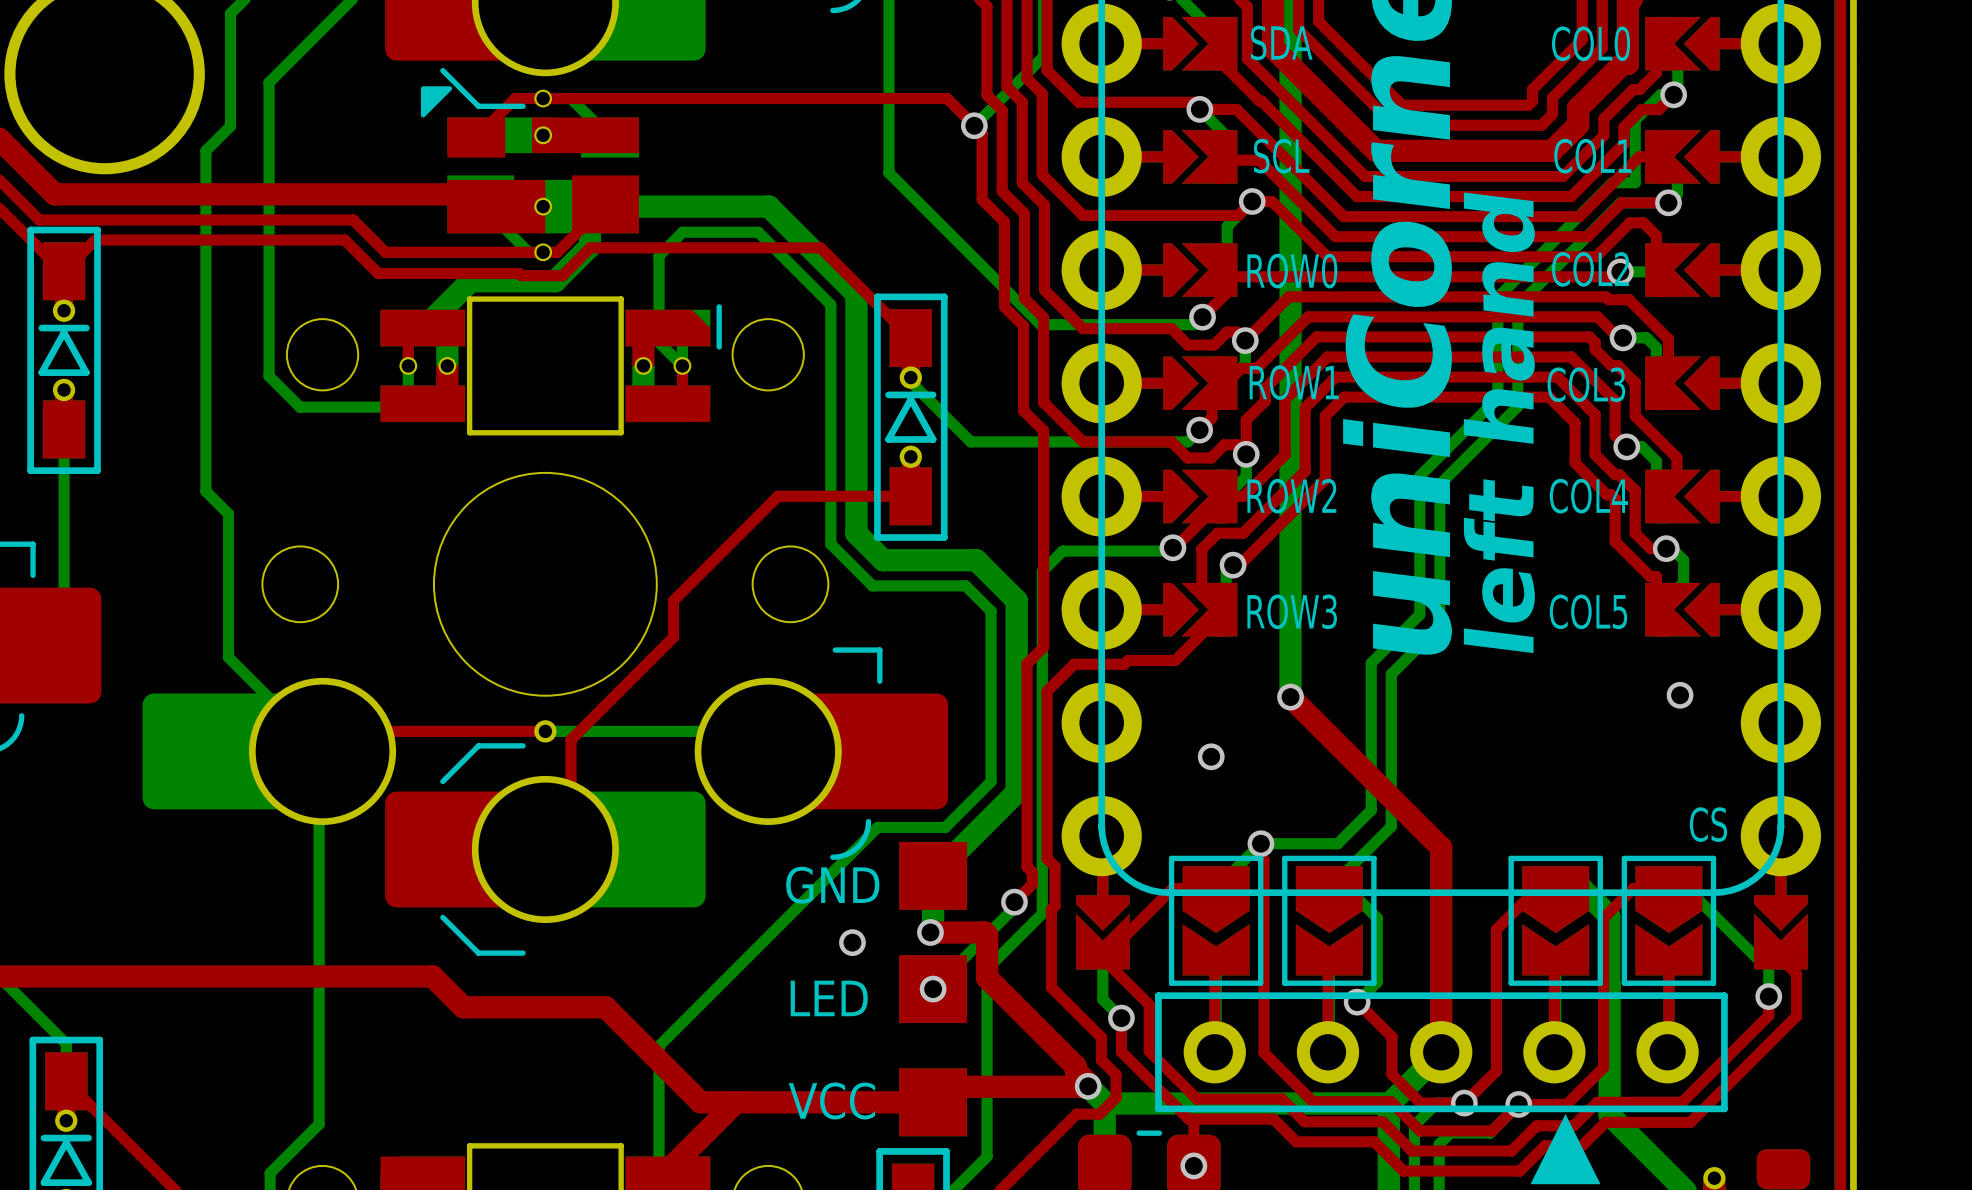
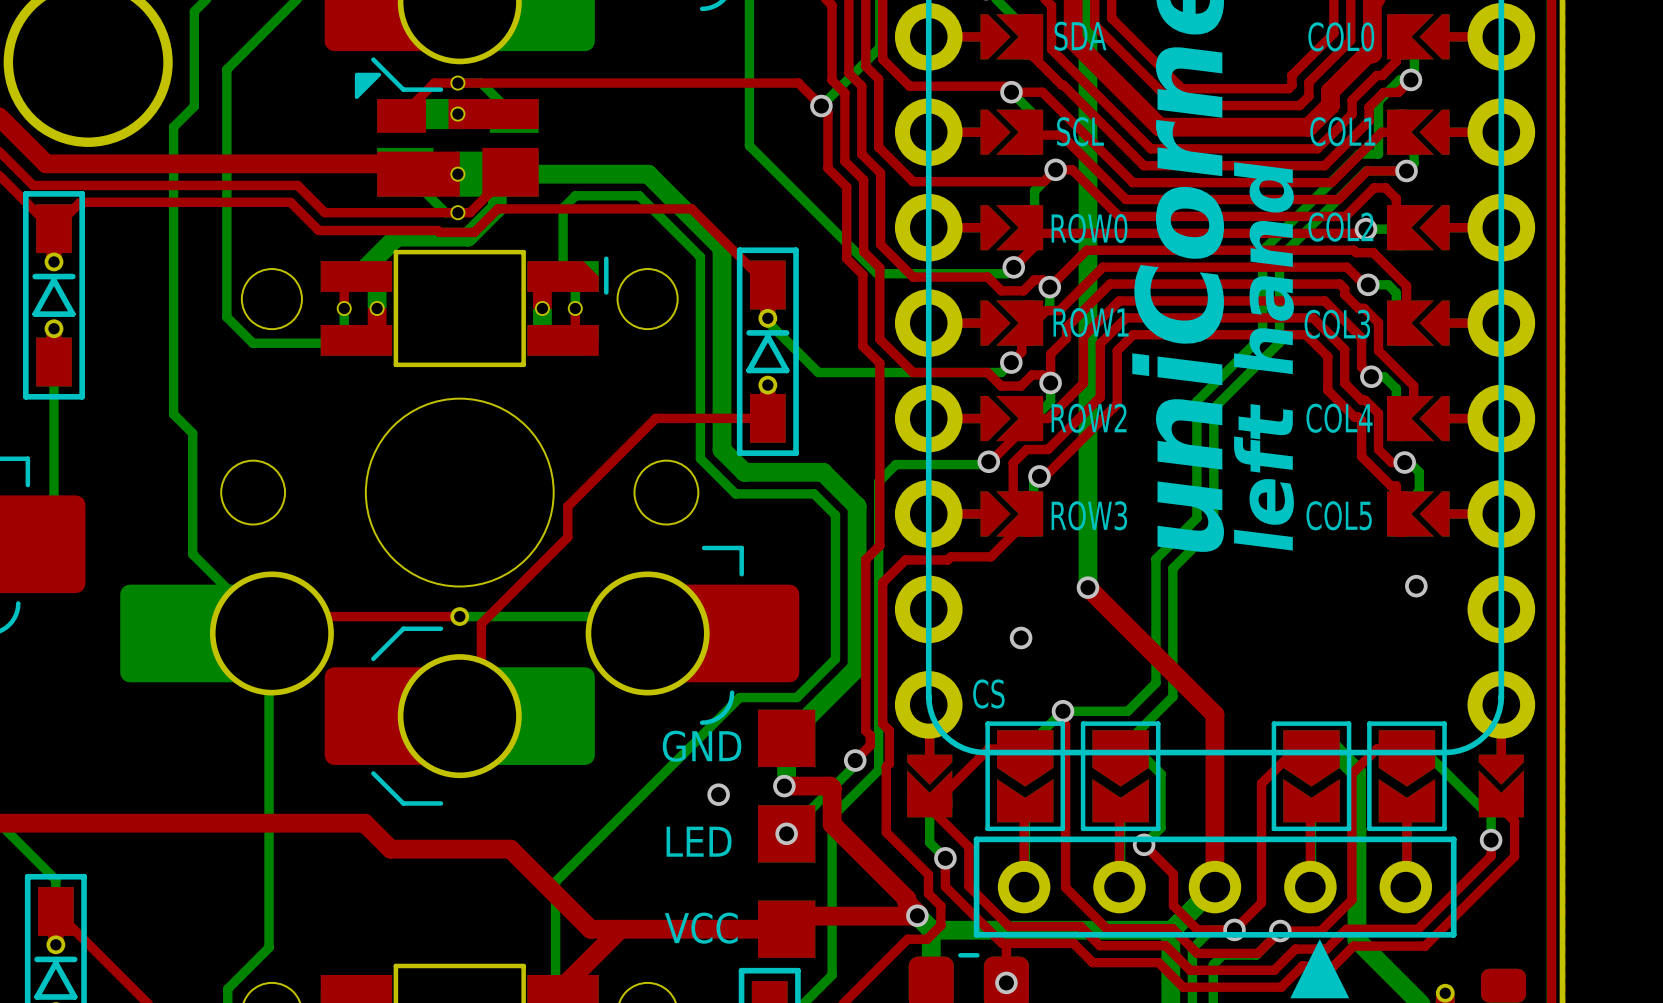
bottom track: (667, 246) (659, 255) (659, 342) (682, 365) -> (563, 208) (563, 276)
part text position: CS (1708, 824) -> CS (988, 694)

